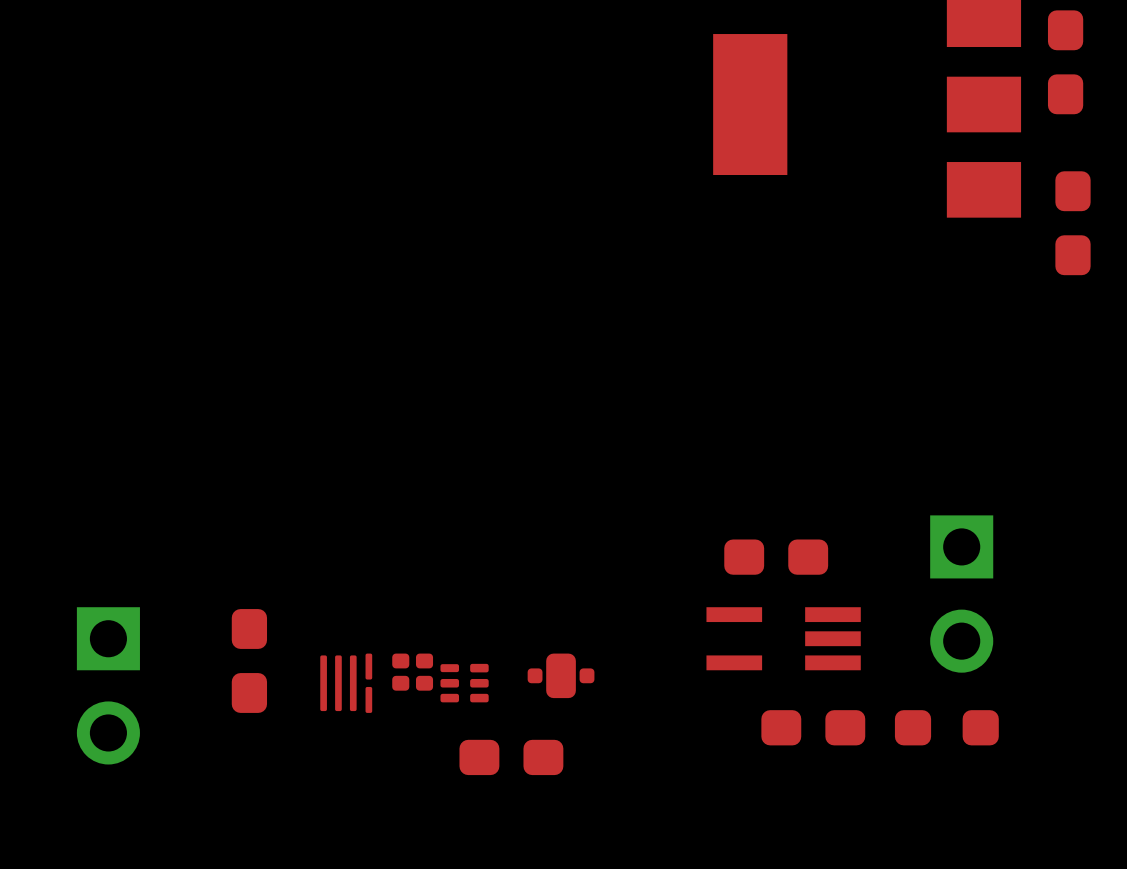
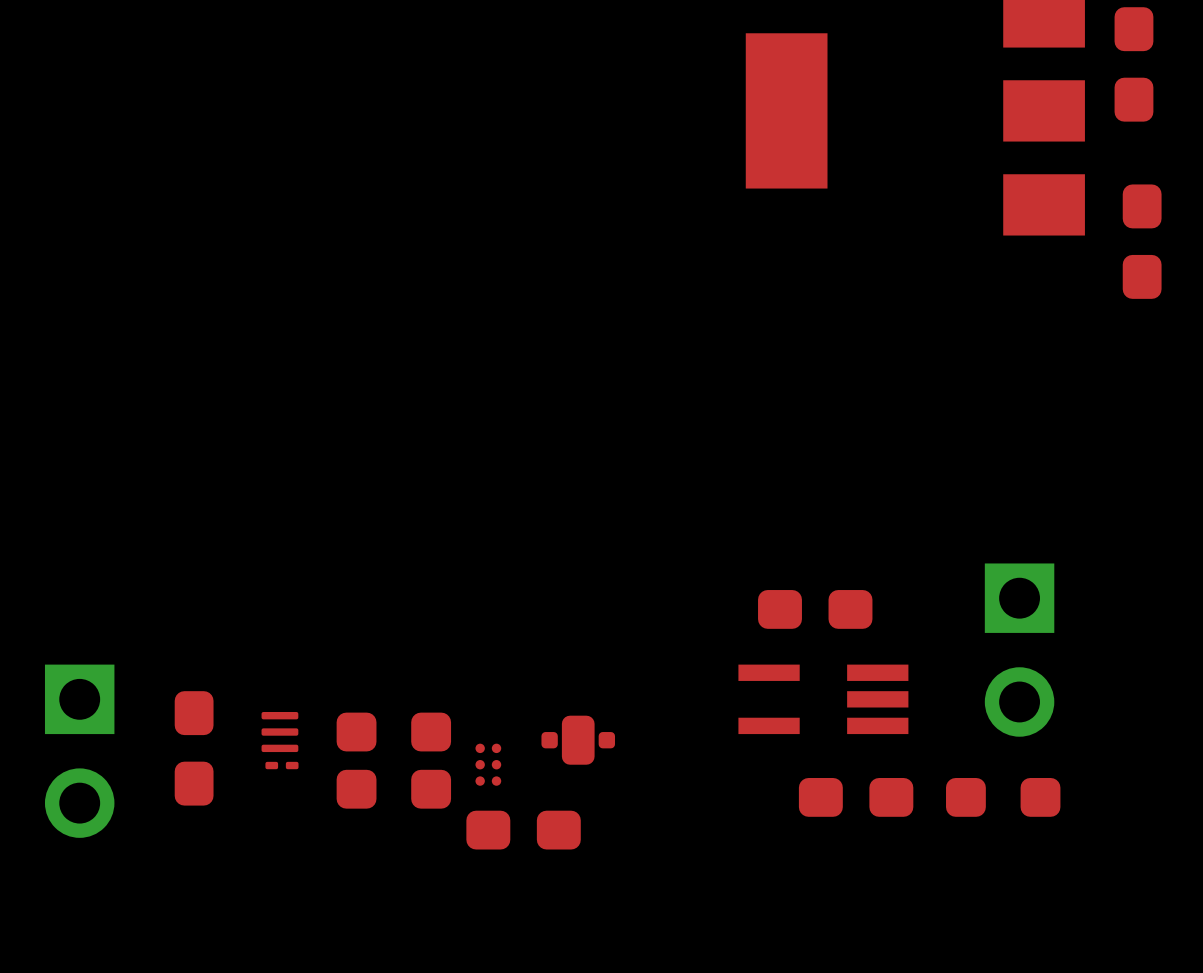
part position: (249, 660) -> (194, 748)
part: (412, 660) -> none
part footprint: [440, 663, 489, 703] -> [475, 743, 502, 786]
part: none -> (393, 732)
part: none -> (280, 740)
part: (346, 683) -> none
part: (412, 683) -> none
part: none -> (393, 789)

